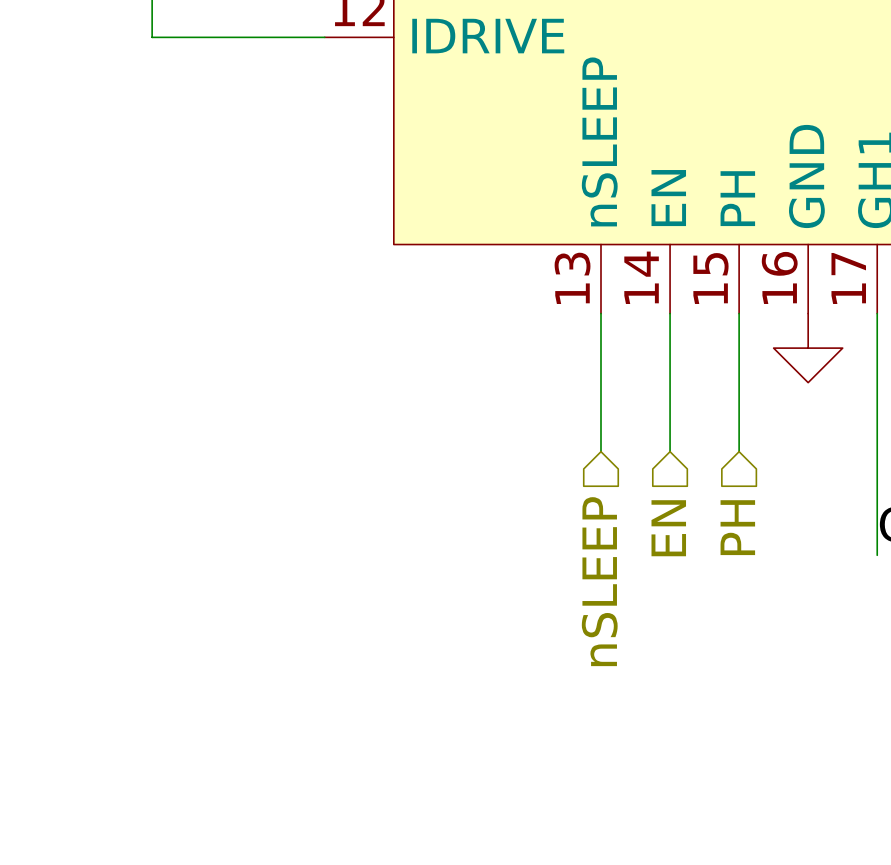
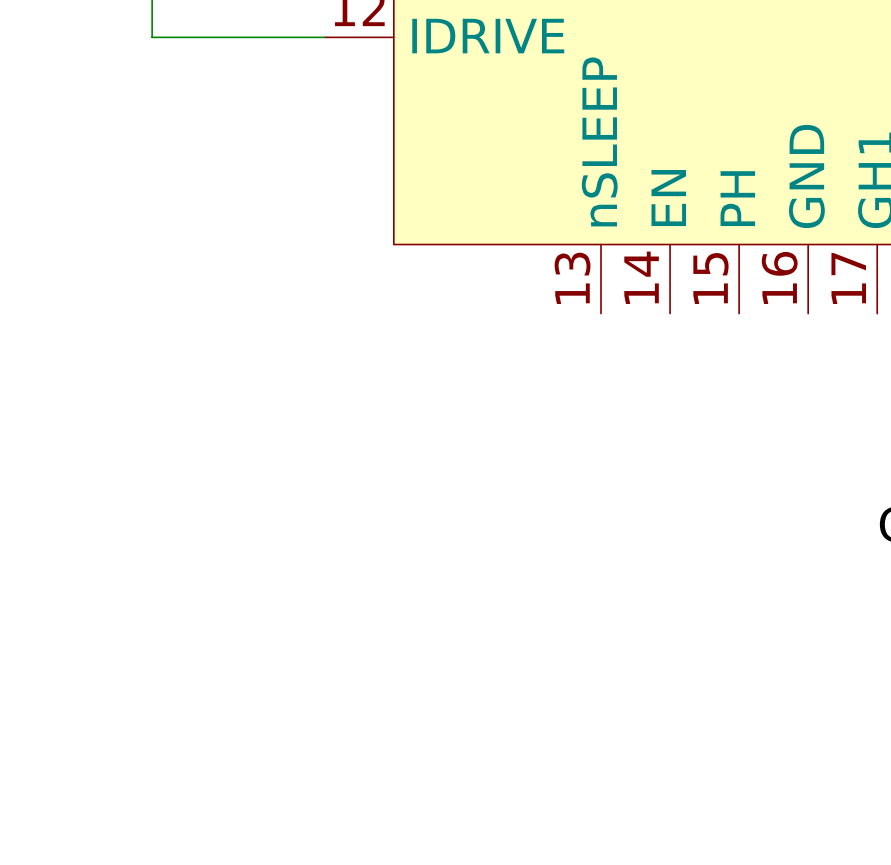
wire: (600, 313) (600, 451) -> none
wire: (670, 313) (670, 451) -> none
wire: (739, 313) (739, 451) -> none
wire: (877, 313) (877, 555) -> none
power symbol: (808, 348) -> none
hierarchical label: PH (737, 527) -> none
hierarchical label: EN (668, 528) -> none
hierarchical label: nSLEEP (599, 581) -> none

